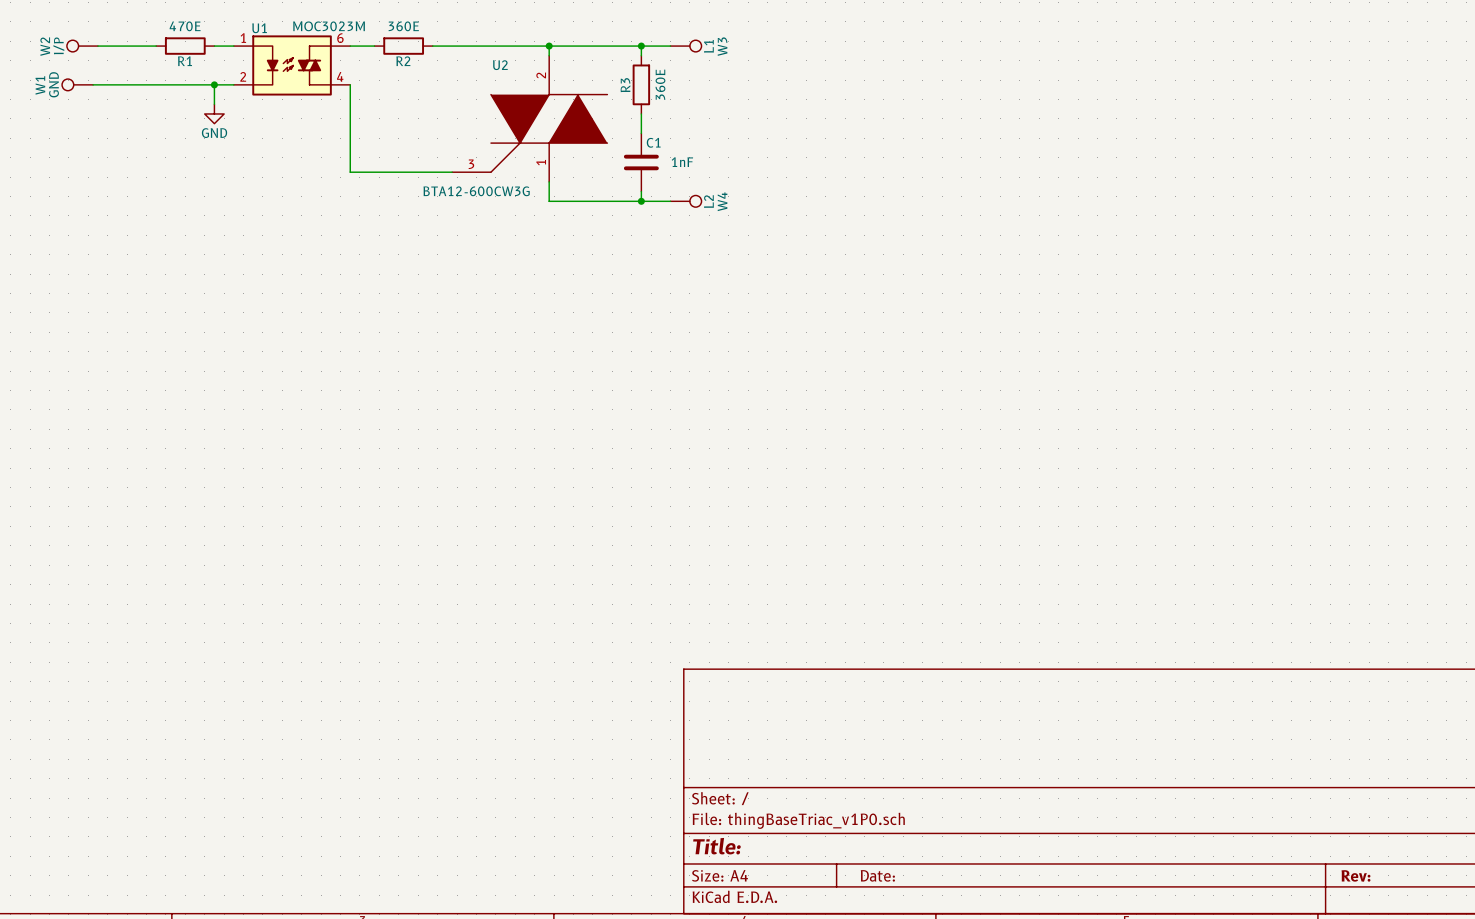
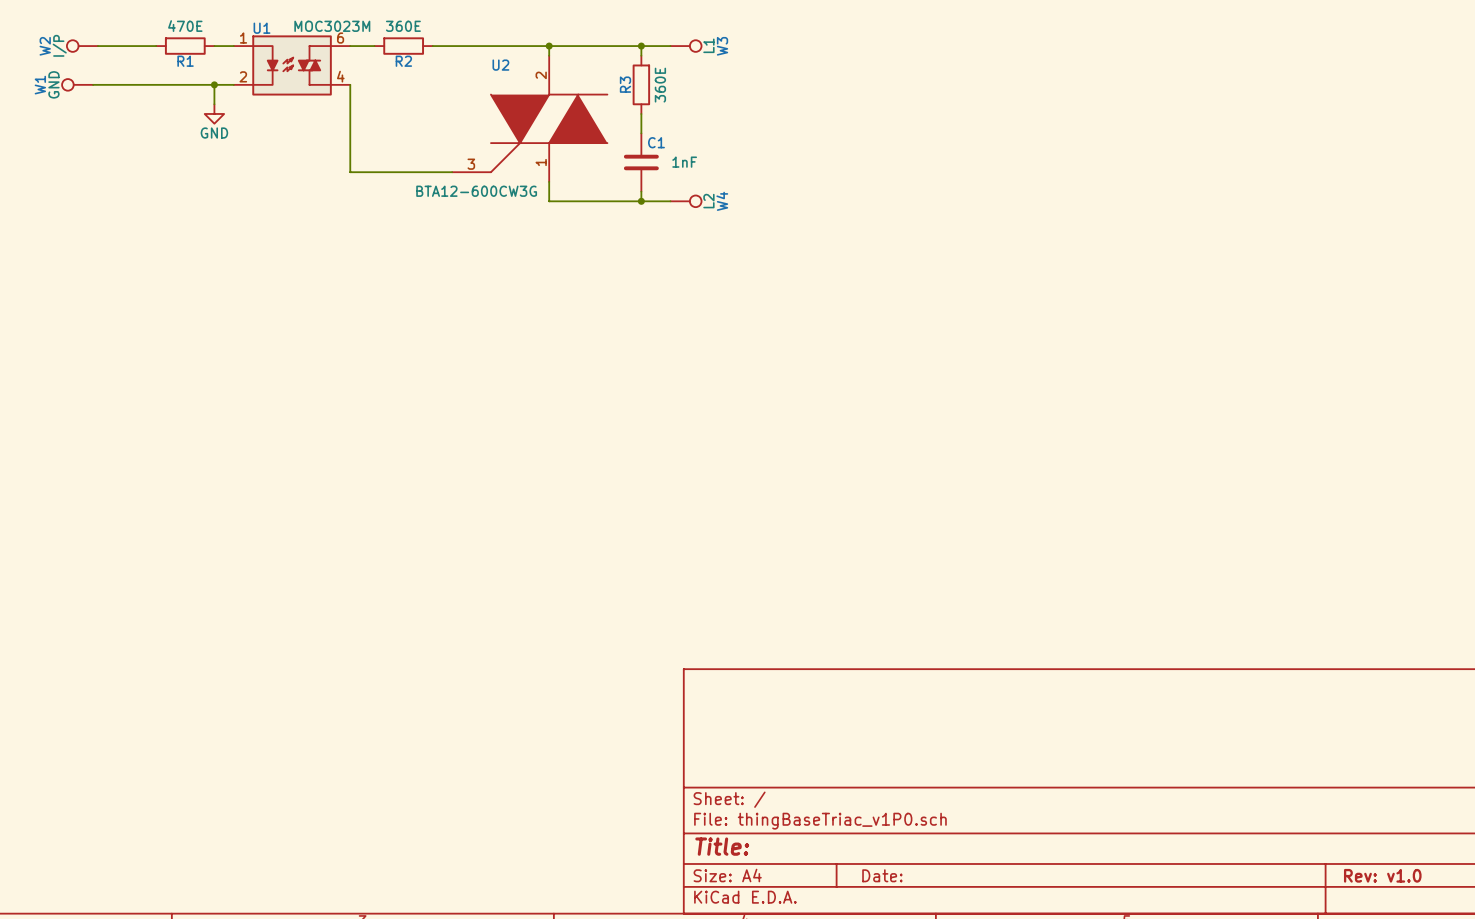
title block: Rev: (1355, 875) -> Rev: v1.0 (1382, 875)

